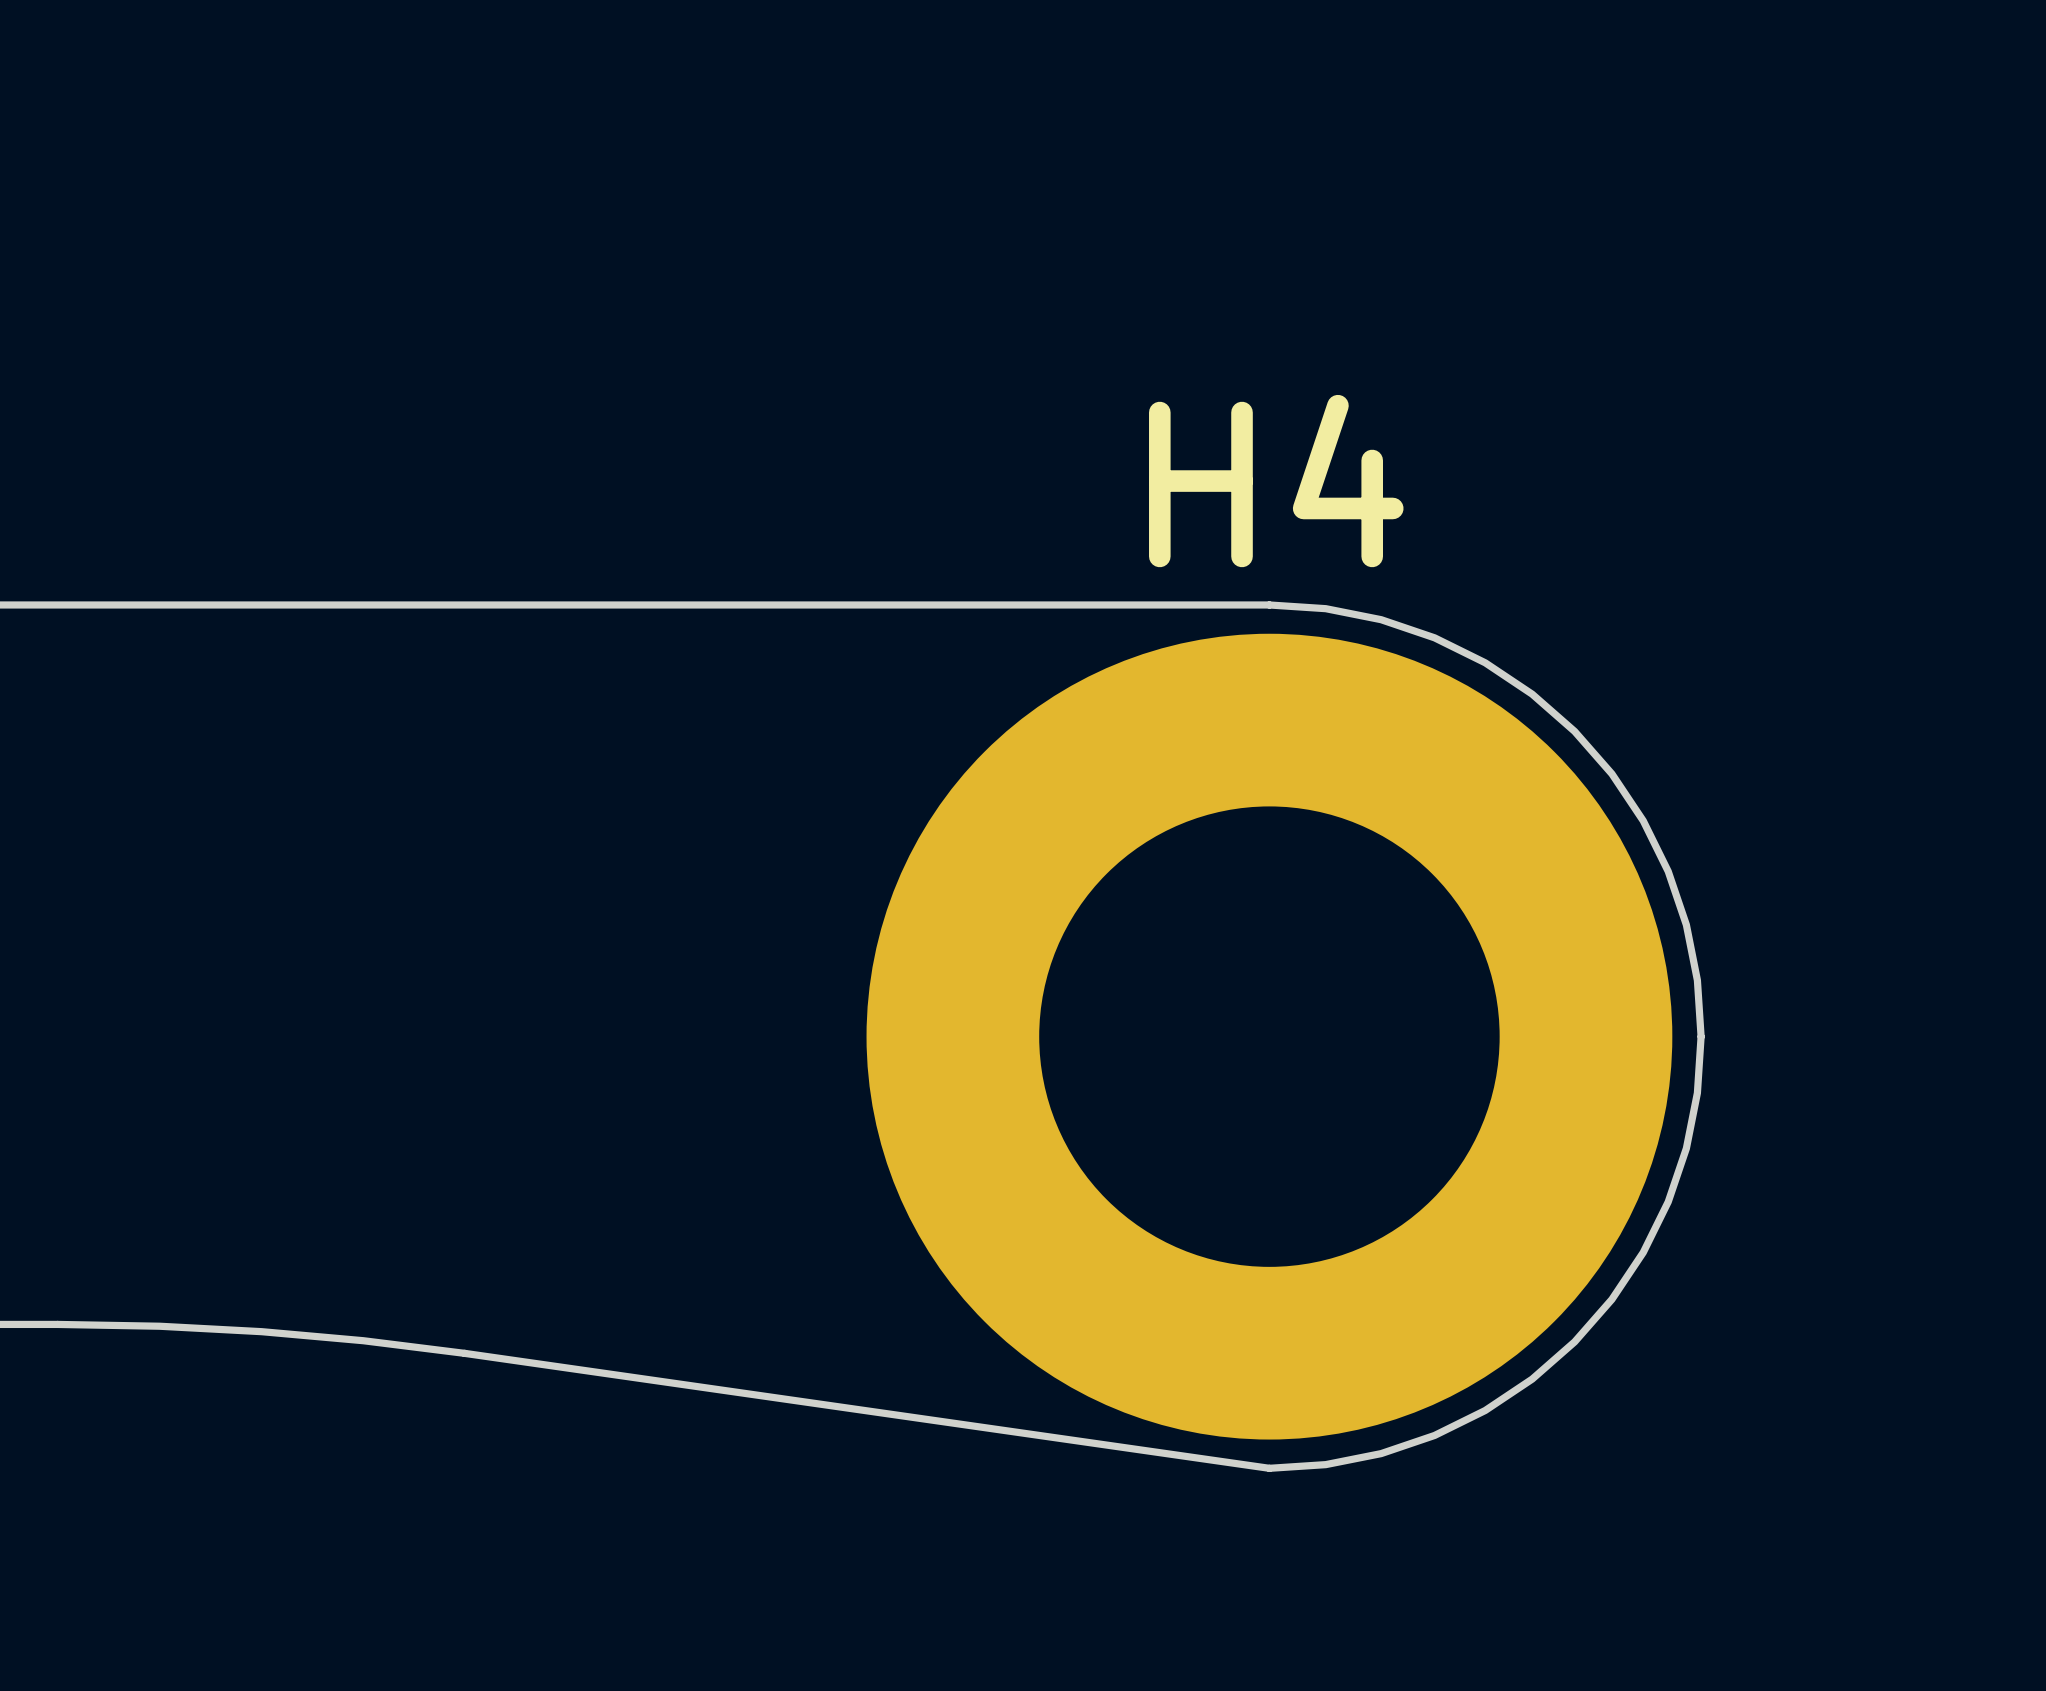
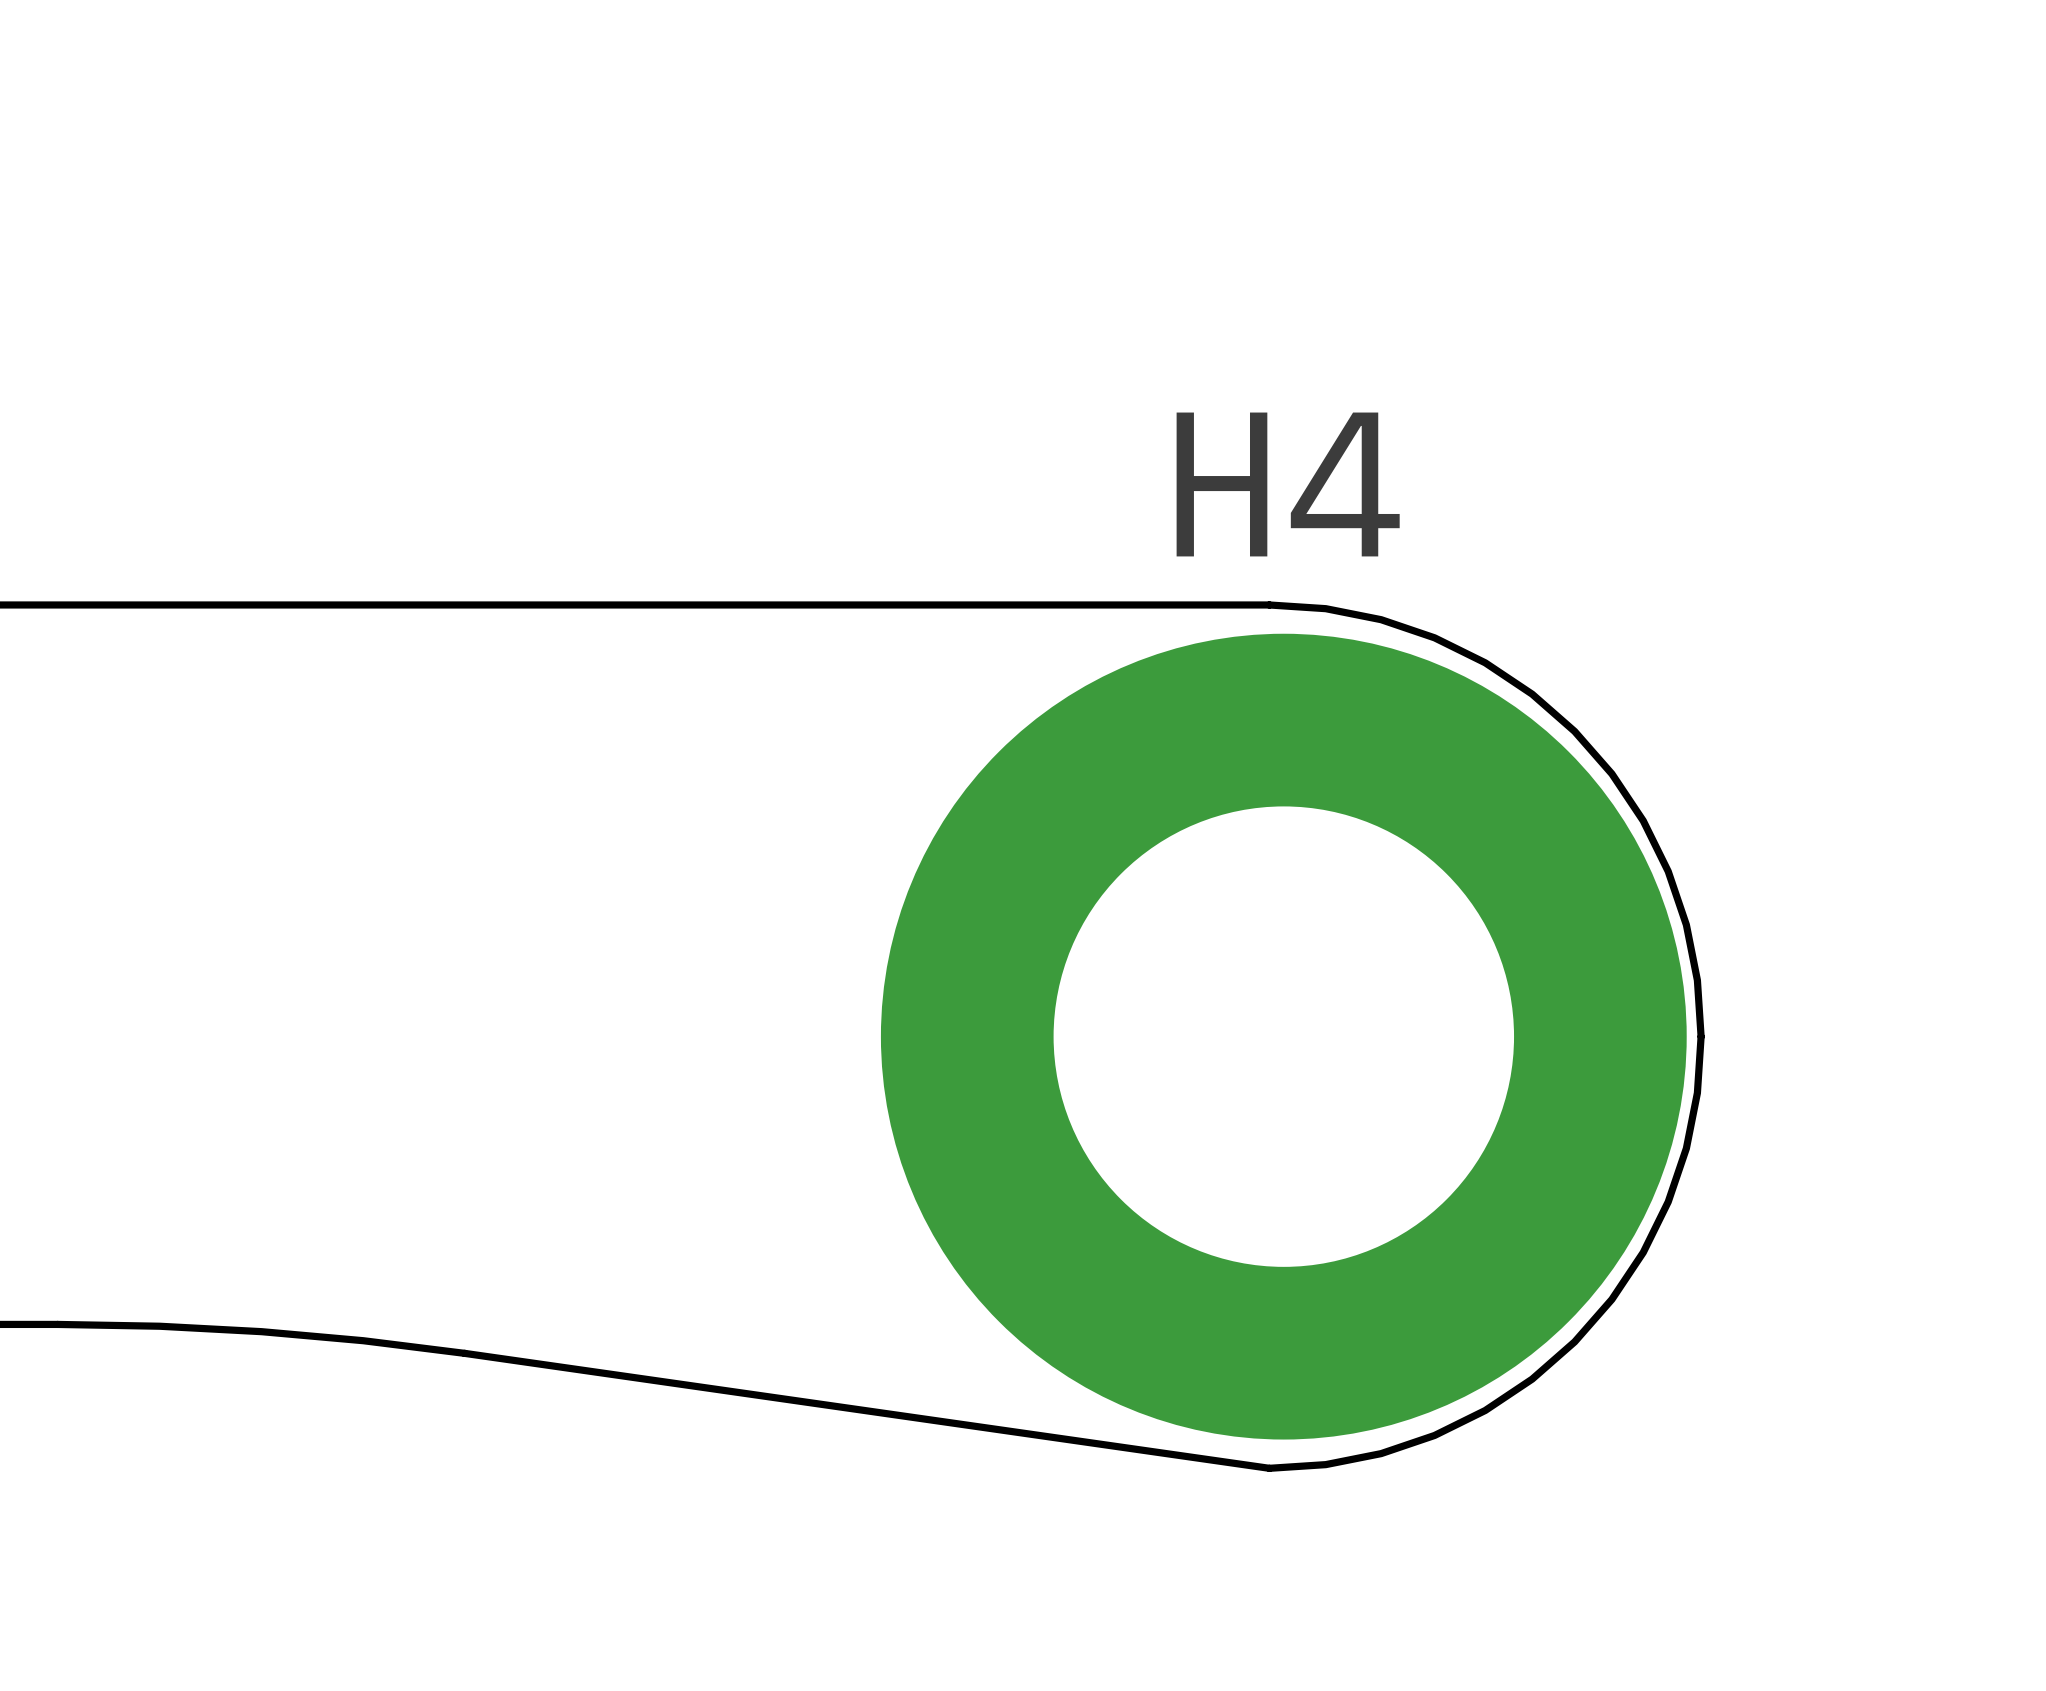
H4 position: (1269, 1036) -> (1283, 1036)

